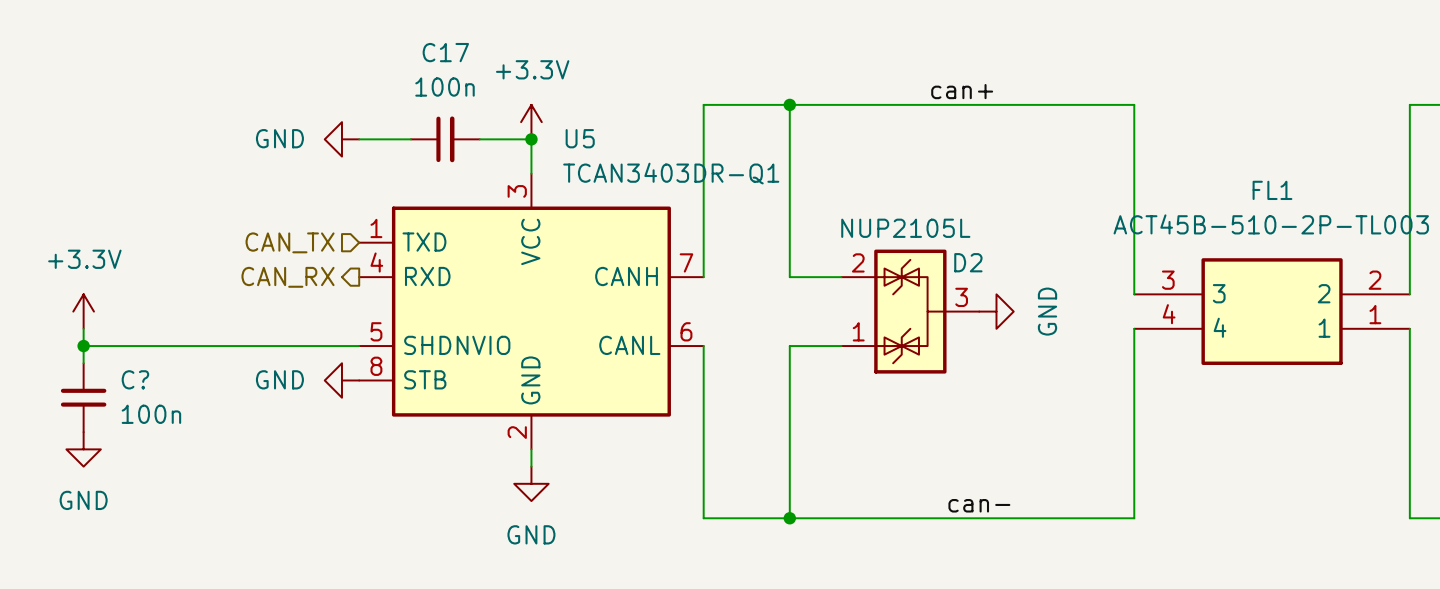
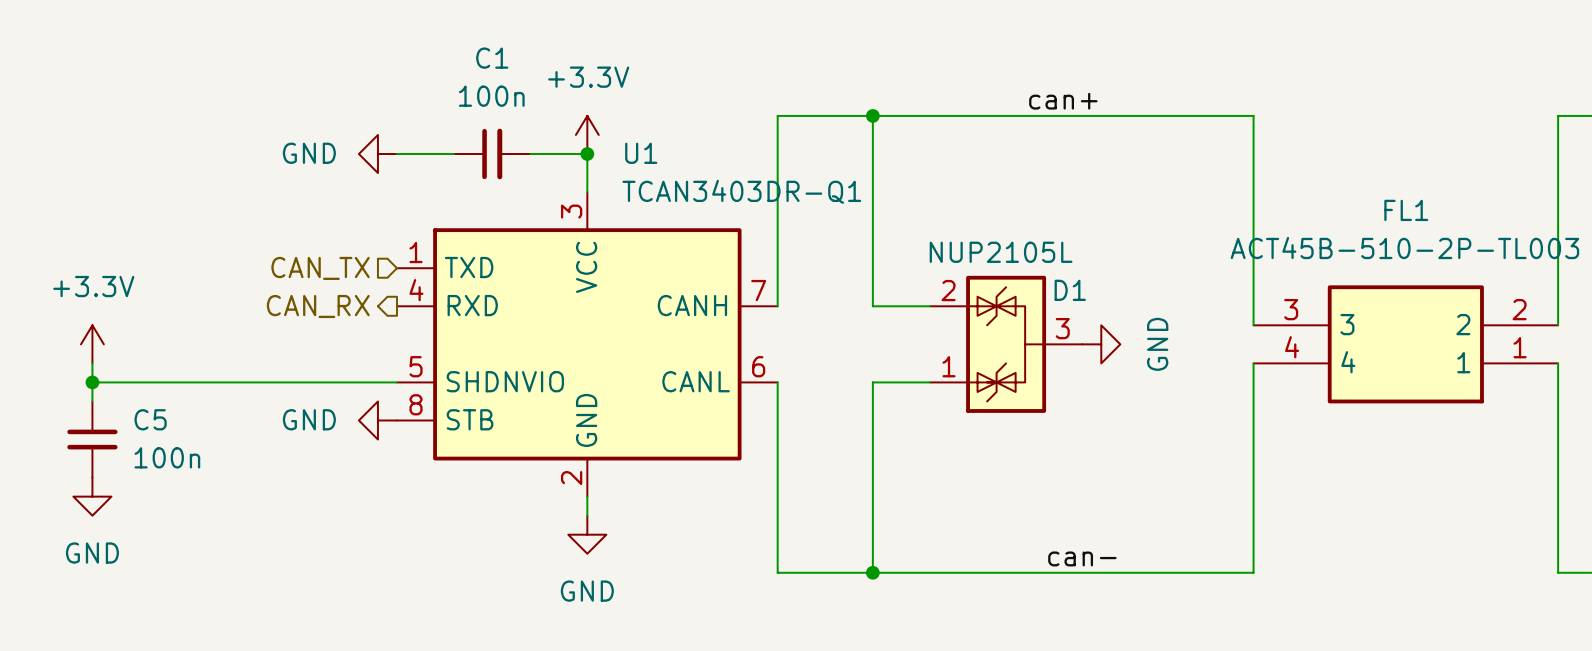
C17 name: C17 (445, 52) -> C1 (492, 58)
U5 name: U5 (580, 138) -> U1 (641, 153)
D2 name: D2 (968, 262) -> D1 (1070, 290)
C? name: C? (135, 379) -> C5 (150, 419)

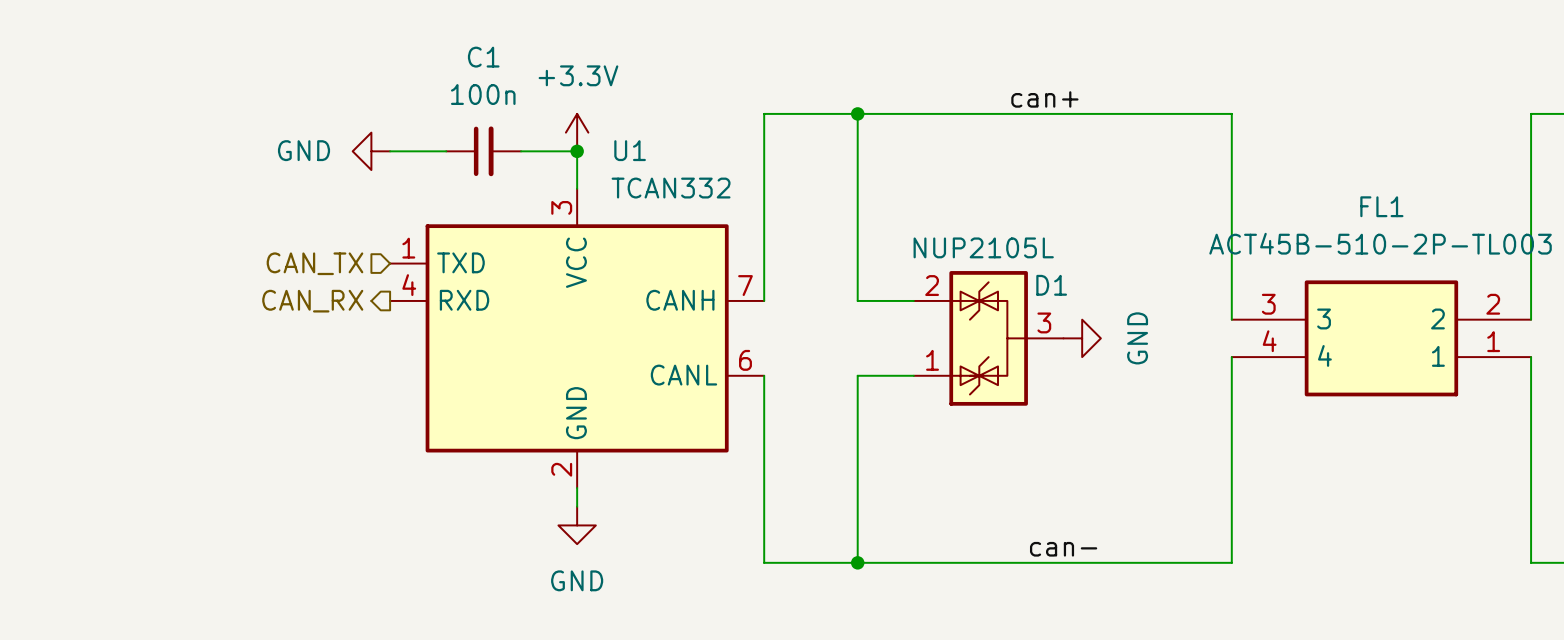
U1 value: TCAN3403DR-Q1 (741, 191) -> TCAN332 (671, 188)
U1 symbol: [396, 192, 778, 497] -> [390, 188, 765, 489]
power symbol: +3.3V (92, 344) -> none
wire: (92, 363) (92, 401) -> none
wire: (92, 382) (396, 382) -> none
junction: (92, 382) -> none
power symbol: GND (377, 420) -> none
C5: 100n (92, 439) -> none
power symbol: GND (92, 496) -> none

